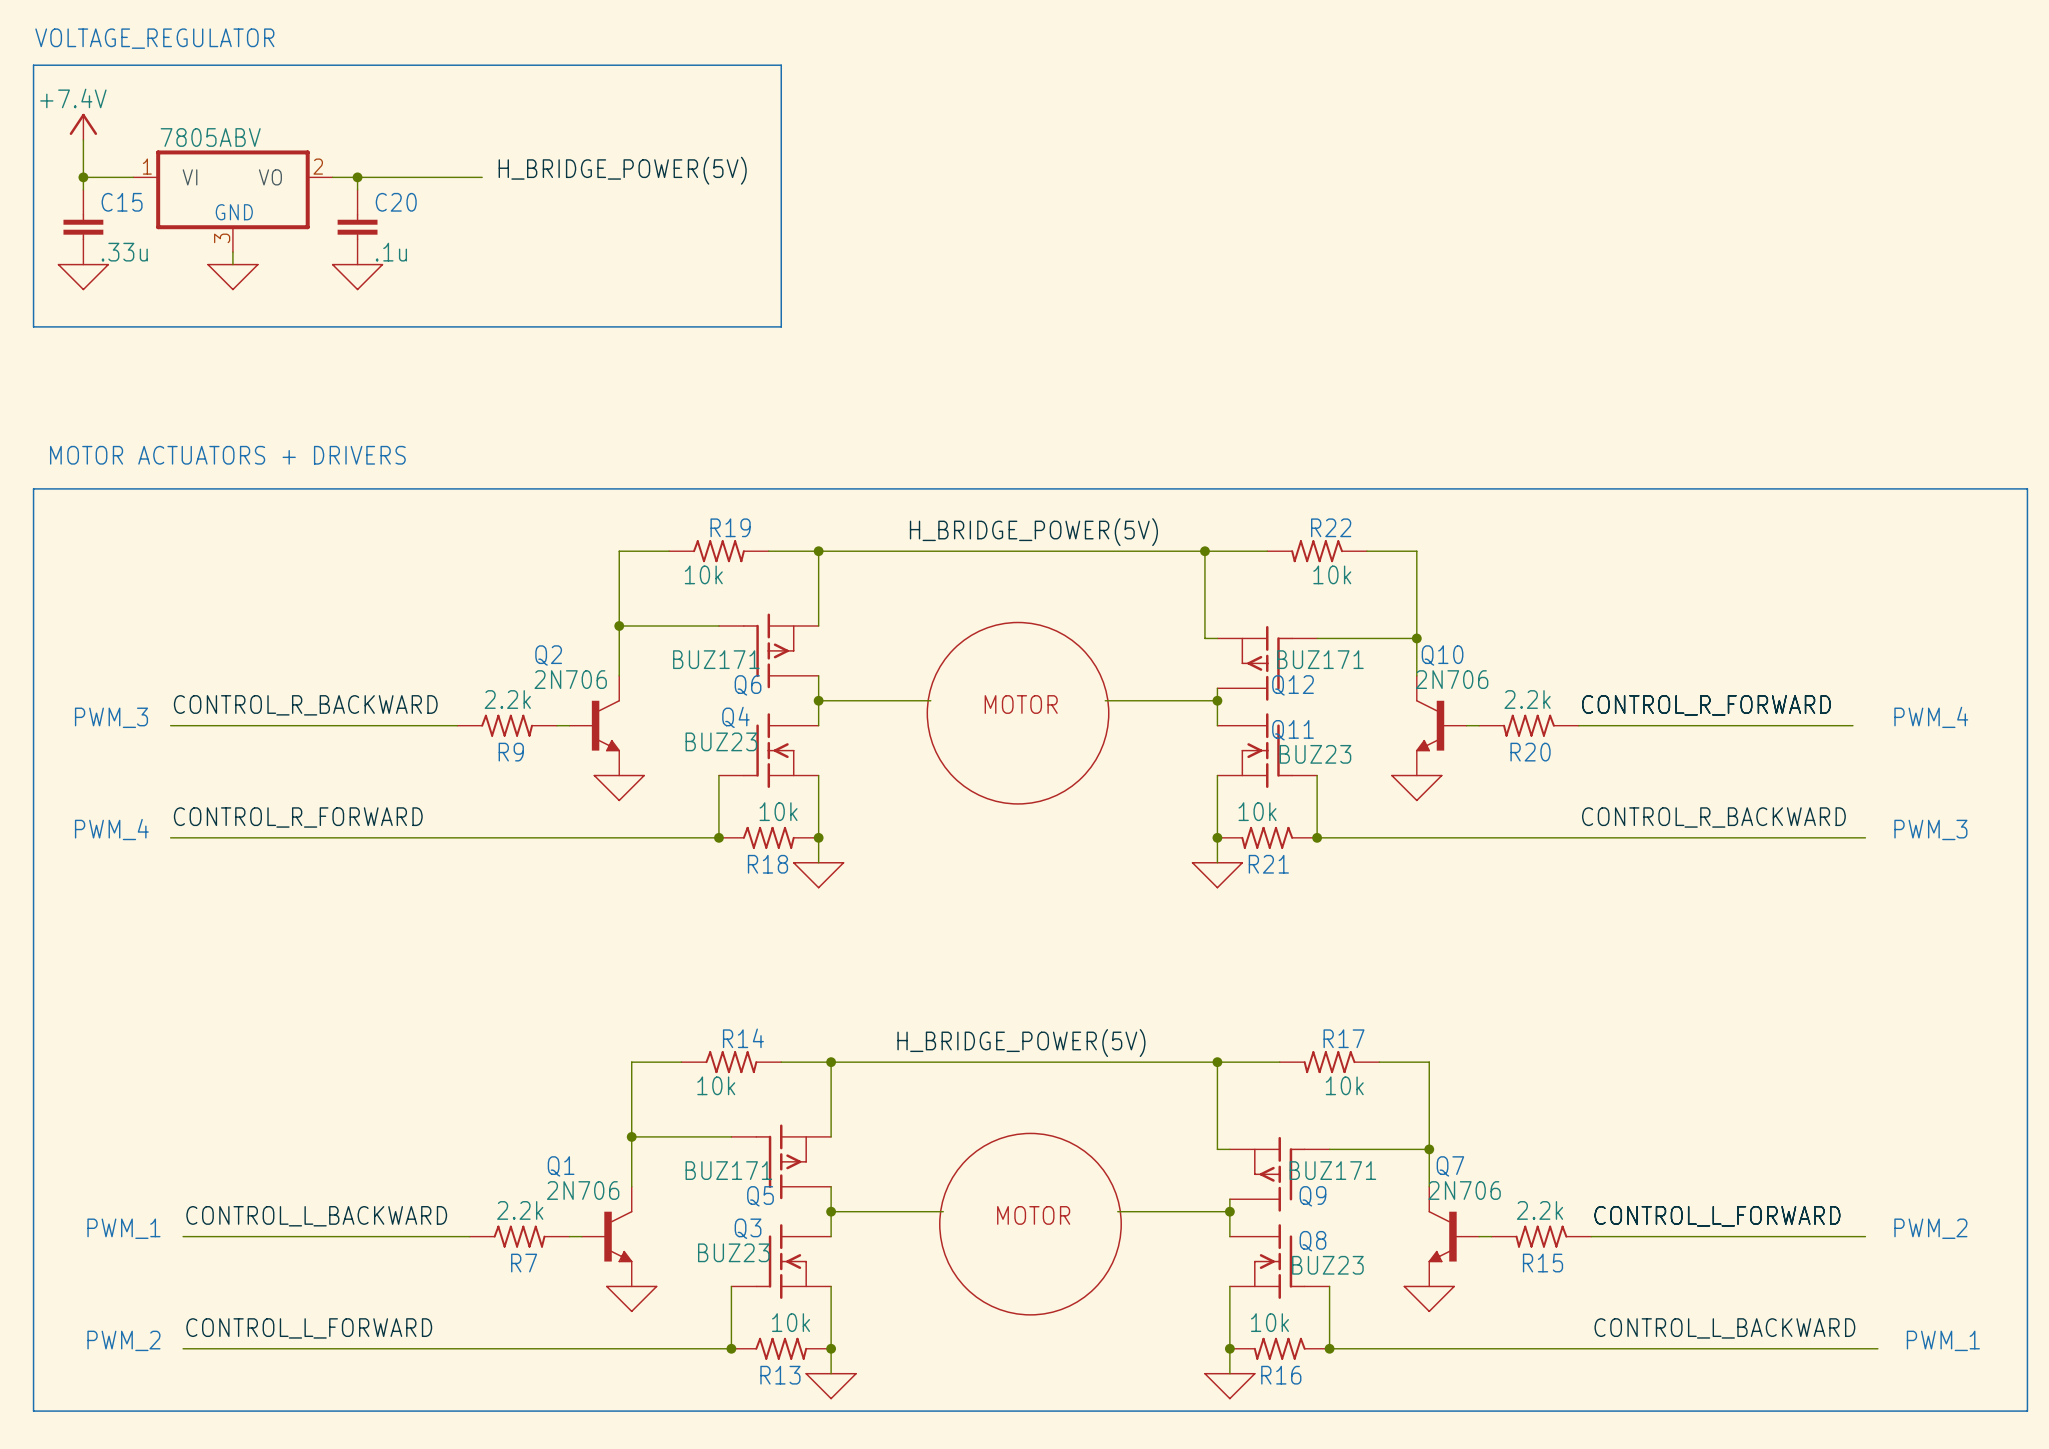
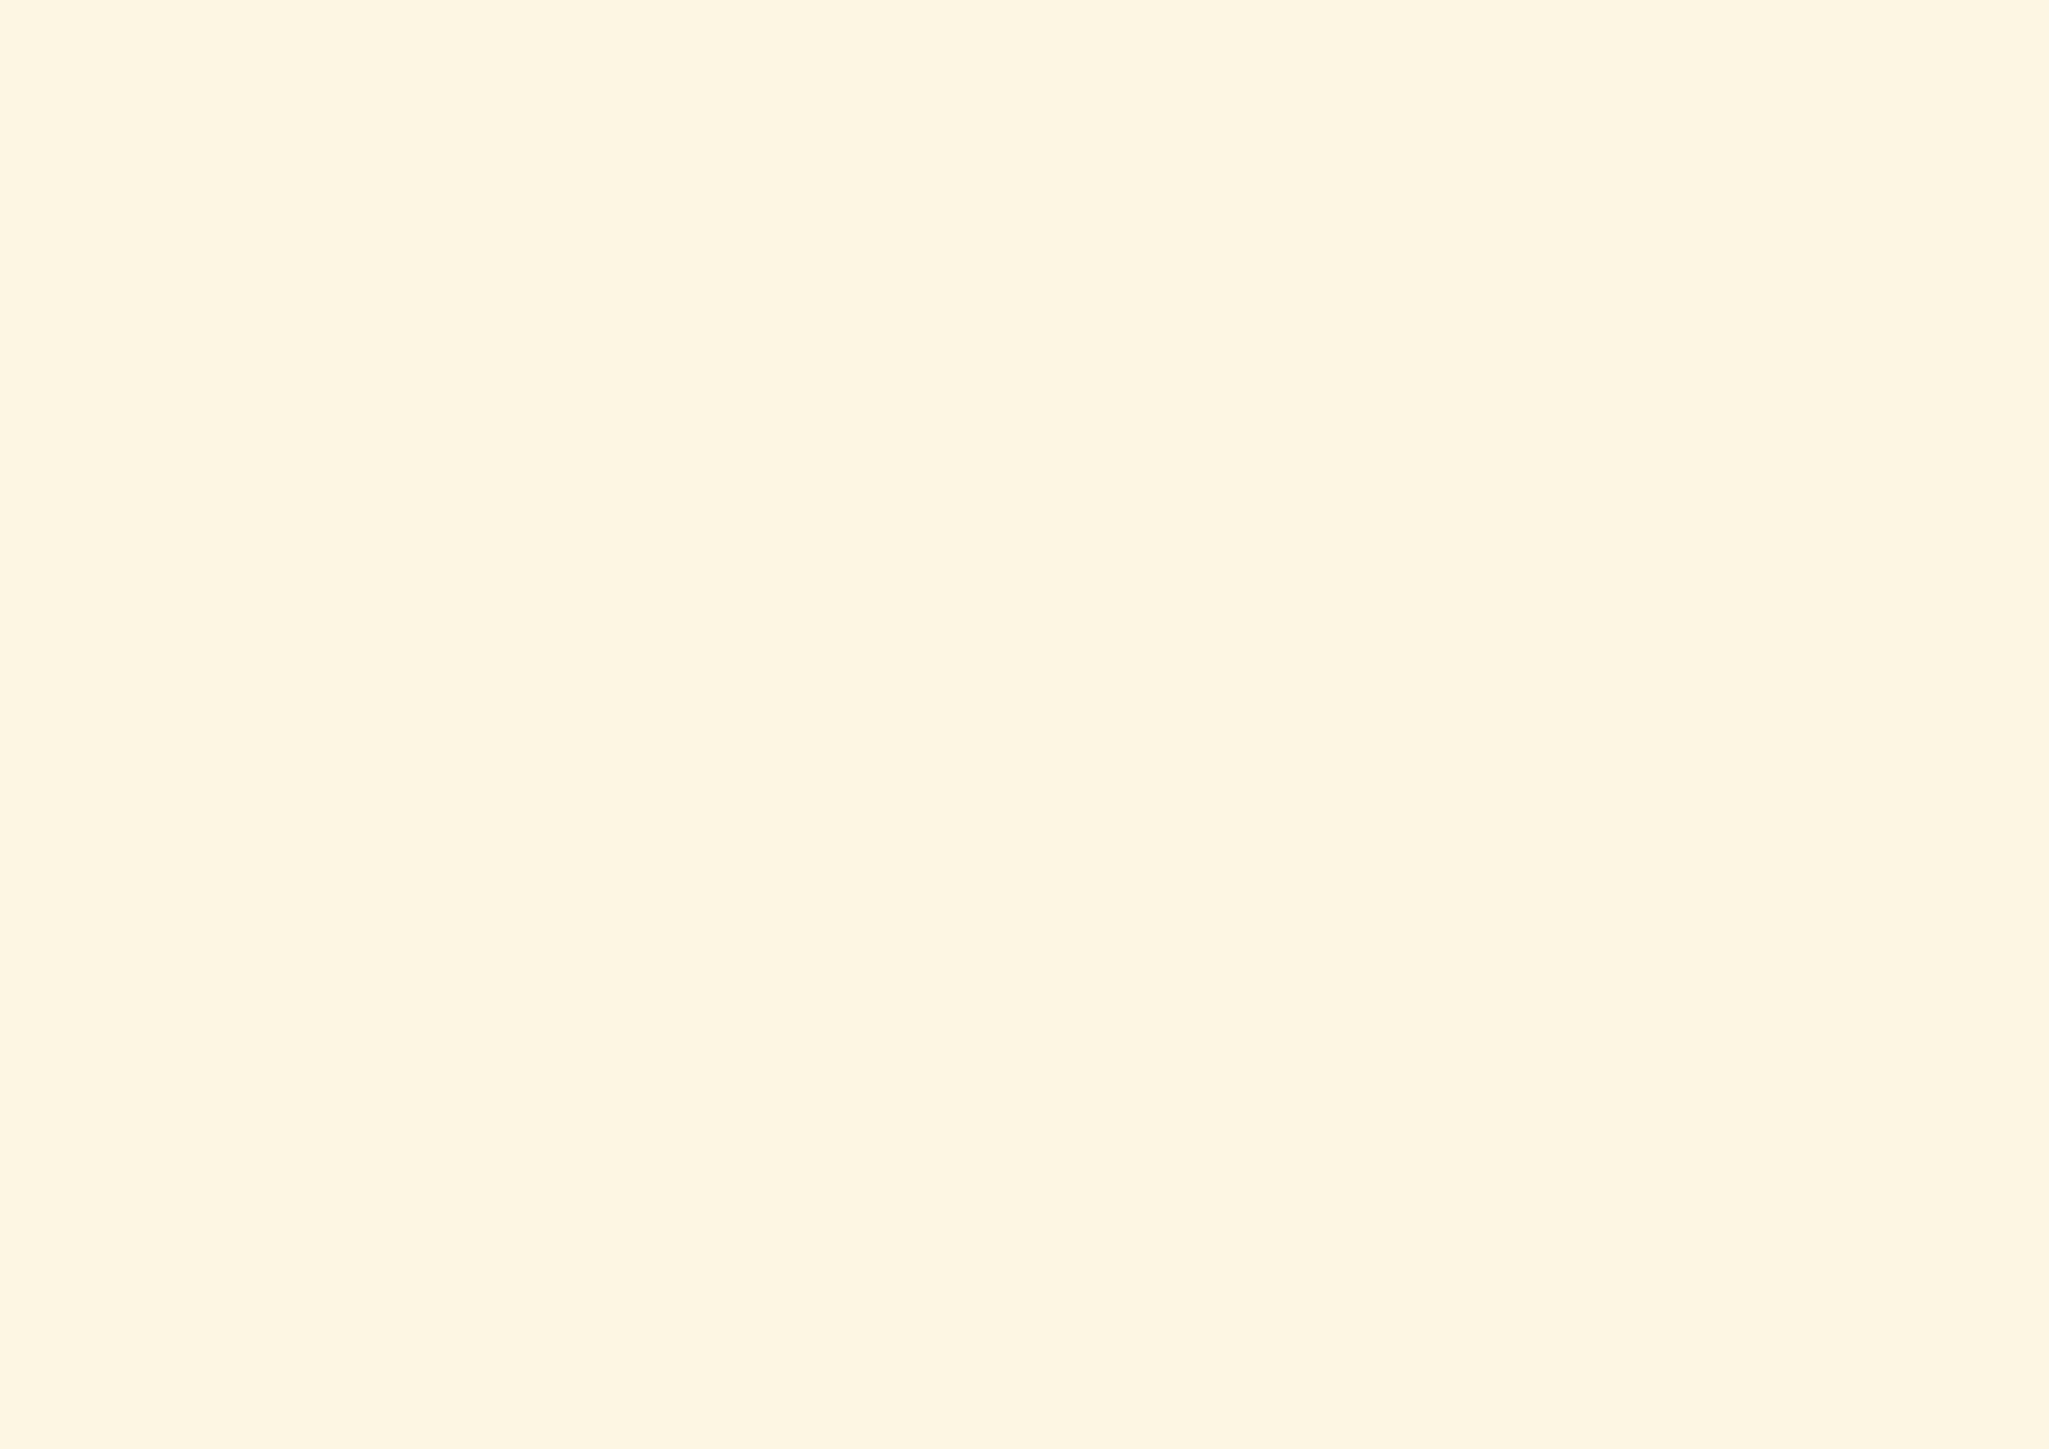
line: (33, 65) (33, 326) (781, 326) (781, 65) (33, 65) -> none
power symbol: +7.4V (83, 126) -> none
wire: (83, 139) (83, 189) -> none
label: H_BRIDGE_POWER(5V) (622, 170) -> none
wire: (83, 177) (133, 177) -> none
junction: (83, 177) -> none
wire: (332, 177) (482, 177) -> none
wire: (357, 177) (357, 189) -> none
junction: (357, 177) -> none
VOLTAGE_REGULATOR: 7805ABV (232, 201) -> none
C15: .33u (83, 227) -> none
C20: .1u (357, 227) -> none
wire: (232, 252) (232, 264) -> none
power symbol: (83, 277) -> none
power symbol: (232, 277) -> none
power symbol: (357, 277) -> none
text: MOTOR ACTUATORS + DRIVERS (227, 455) -> none
line: (33, 488) (33, 1411) (2027, 1411) (2027, 488) (33, 488) -> none
label: H_BRIDGE_POWER(5V) (1033, 532) -> none
wire: (669, 551) (619, 551) (619, 675) -> none
R19: 10k (718, 551) -> none
wire: (768, 551) (1267, 551) -> none
wire: (818, 551) (818, 625) -> none
junction: (818, 551) -> none
wire: (1204, 551) (1204, 638) (1217, 638) -> none
junction: (1204, 551) -> none
R22: 10k (1317, 551) -> none
wire: (1366, 551) (1416, 551) (1416, 675) -> none
drawing: [926, 621, 1110, 805] -> none
wire: (619, 625) (718, 625) -> none
junction: (619, 625) -> none
wire: (1317, 638) (1416, 638) -> none
junction: (1416, 638) -> none
Q6: BUZ171 (768, 650) -> none
Q12: BUZ171 (1267, 663) -> none
wire: (818, 675) (818, 725) -> none
wire: (1217, 688) (1217, 725) -> none
wire: (818, 700) (930, 700) -> none
junction: (818, 700) -> none
wire: (1105, 700) (1217, 700) -> none
junction: (1217, 700) -> none
text: MOTOR (1021, 704) -> none
label: CONTROL_R_BACKWARD (305, 705) -> none
label: CONTROL_R_FORWARD (1706, 705) -> none
text: PWM_3 (111, 717) -> none
text: PWM_4 (1931, 717) -> none
wire: (170, 725) (457, 725) -> none
R9: 2.2k (507, 725) -> none
wire: (556, 725) (569, 725) -> none
Q2: 2N706 (594, 725) -> none
Q10: 2N706 (1441, 725) -> none
wire: (1466, 725) (1479, 725) -> none
R20: 2.2k (1528, 725) -> none
wire: (1578, 725) (1852, 725) -> none
Q4: BUZ23 (768, 750) -> none
Q11: BUZ23 (1267, 750) -> none
wire: (718, 775) (718, 837) (170, 837) -> none
wire: (818, 775) (818, 862) -> none
wire: (1217, 775) (1217, 862) -> none
wire: (1317, 775) (1317, 837) (1865, 837) -> none
power symbol: (619, 787) -> none
power symbol: (1416, 787) -> none
label: CONTROL_R_FORWARD (298, 817) -> none
label: CONTROL_R_BACKWARD (1713, 817) -> none
text: PWM_4 (111, 829) -> none
text: PWM_3 (1930, 829) -> none
junction: (718, 837) -> none
R18: 10k (768, 837) -> none
junction: (818, 837) -> none
junction: (1217, 837) -> none
R21: 10k (1267, 837) -> none
junction: (1317, 837) -> none
power symbol: (818, 875) -> none
power symbol: (1217, 875) -> none
label: H_BRIDGE_POWER(5V) (1021, 1043) -> none
wire: (681, 1062) (631, 1062) (631, 1186) -> none
R14: 10k (731, 1062) -> none
wire: (781, 1062) (1279, 1062) -> none
wire: (831, 1062) (831, 1136) -> none
junction: (831, 1062) -> none
wire: (1217, 1062) (1217, 1149) (1229, 1149) -> none
junction: (1217, 1062) -> none
R17: 10k (1329, 1062) -> none
wire: (1379, 1062) (1429, 1062) (1429, 1186) -> none
drawing: [939, 1132, 1122, 1316] -> none
wire: (631, 1136) (731, 1136) -> none
junction: (631, 1136) -> none
wire: (1329, 1149) (1429, 1149) -> none
junction: (1429, 1149) -> none
Q5: BUZ171 (781, 1161) -> none
Q9: BUZ171 (1279, 1174) -> none
wire: (831, 1186) (831, 1236) -> none
wire: (1229, 1199) (1229, 1236) -> none
wire: (831, 1211) (943, 1211) -> none
junction: (831, 1211) -> none
wire: (1117, 1211) (1229, 1211) -> none
junction: (1229, 1211) -> none
text: MOTOR (1033, 1215) -> none
label: CONTROL_L_BACKWARD (316, 1216) -> none
label: CONTROL_L_FORWARD (1717, 1216) -> none
text: PWM_1 (123, 1228) -> none
text: PWM_2 (1930, 1228) -> none
wire: (183, 1236) (469, 1236) -> none
R7: 2.2k (519, 1236) -> none
wire: (569, 1236) (581, 1236) -> none
Q1: 2N706 (607, 1236) -> none
Q7: 2N706 (1453, 1236) -> none
wire: (1479, 1236) (1491, 1236) -> none
R15: 2.2k (1541, 1236) -> none
wire: (1591, 1236) (1865, 1236) -> none
Q3: BUZ23 (781, 1261) -> none
Q8: BUZ23 (1279, 1261) -> none
wire: (731, 1286) (731, 1348) (183, 1348) -> none
wire: (831, 1286) (831, 1373) -> none
wire: (1229, 1286) (1229, 1373) -> none
wire: (1329, 1286) (1329, 1348) (1877, 1348) -> none
power symbol: (631, 1298) -> none
power symbol: (1429, 1298) -> none
label: CONTROL_L_FORWARD (309, 1328) -> none
label: CONTROL_L_BACKWARD (1724, 1328) -> none
text: PWM_2 (123, 1340) -> none
text: PWM_1 (1943, 1340) -> none
junction: (731, 1348) -> none
R13: 10k (781, 1348) -> none
junction: (831, 1348) -> none
junction: (1229, 1348) -> none
R16: 10k (1279, 1348) -> none
junction: (1329, 1348) -> none
power symbol: (831, 1386) -> none
power symbol: (1229, 1386) -> none

